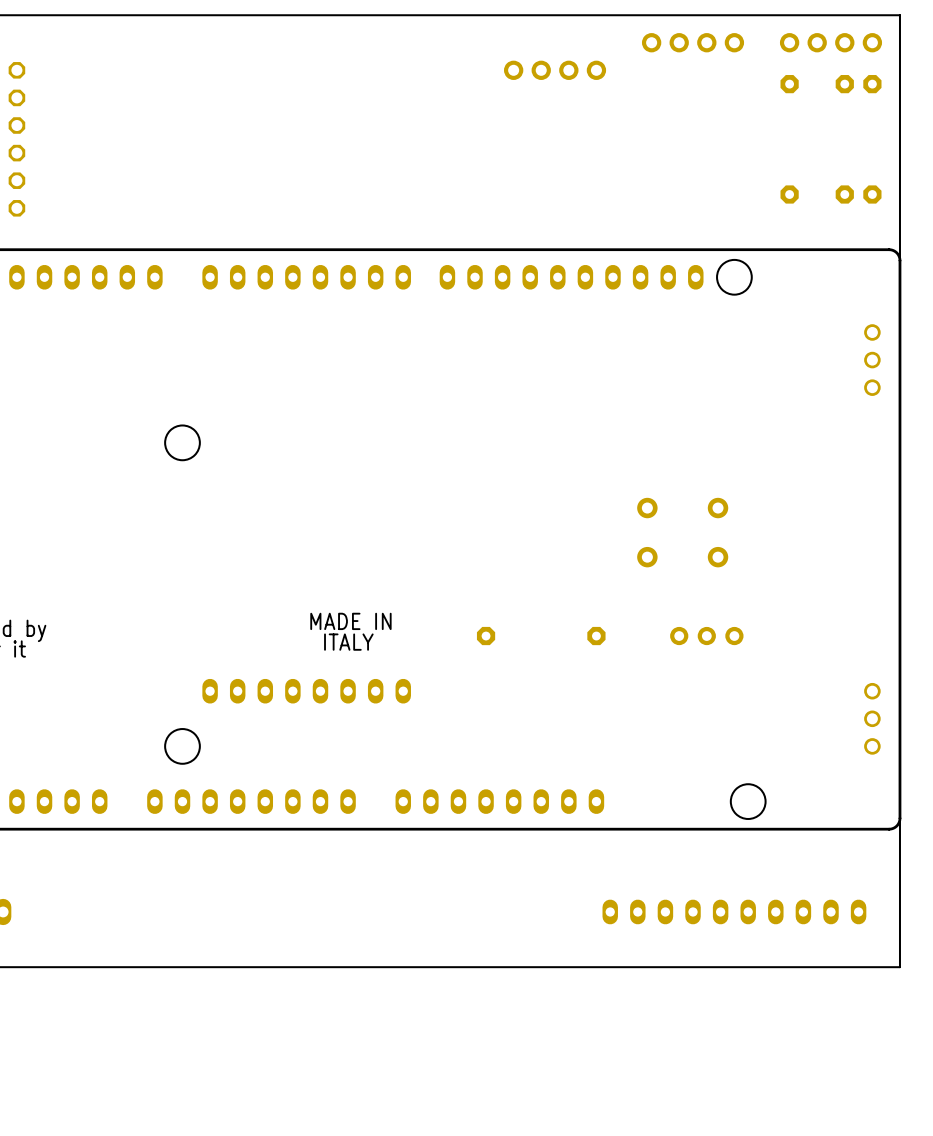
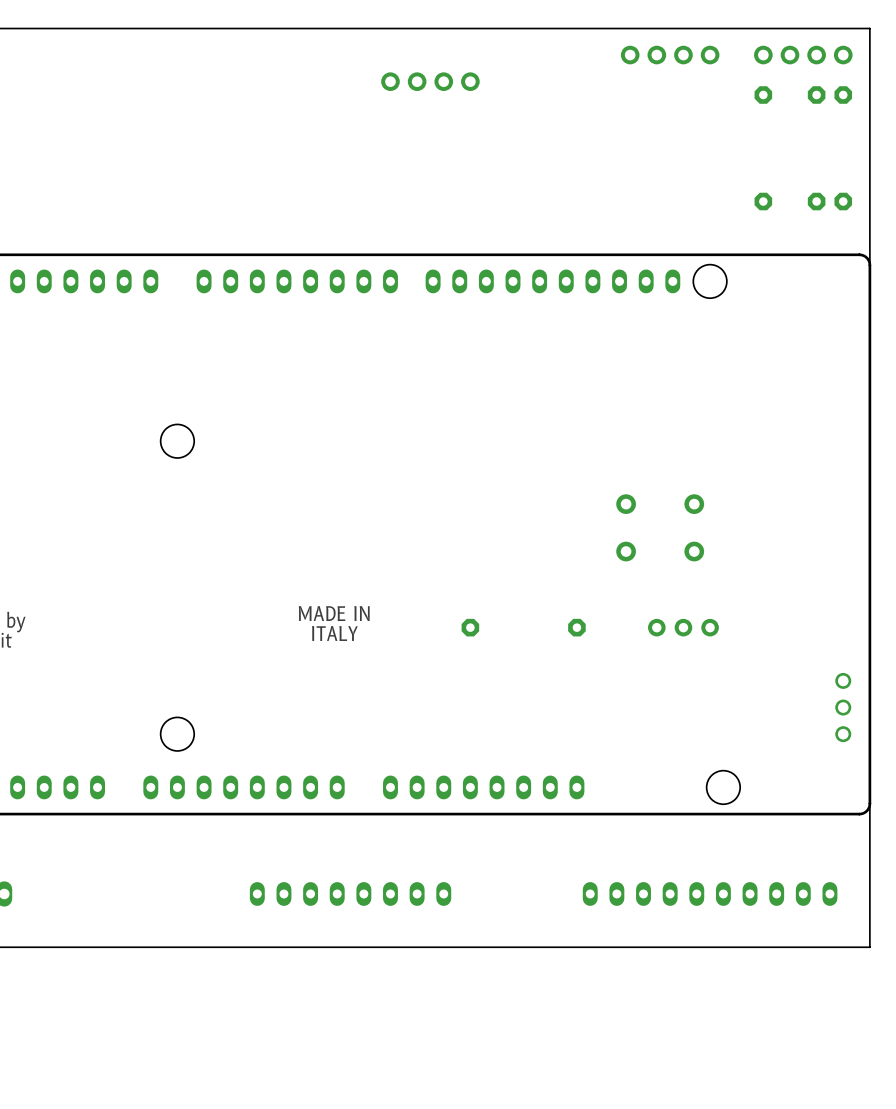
part position: (555, 70) -> (430, 81)
part: (16, 139) -> none
part: (872, 360) -> none
part position: (306, 691) -> (350, 893)

